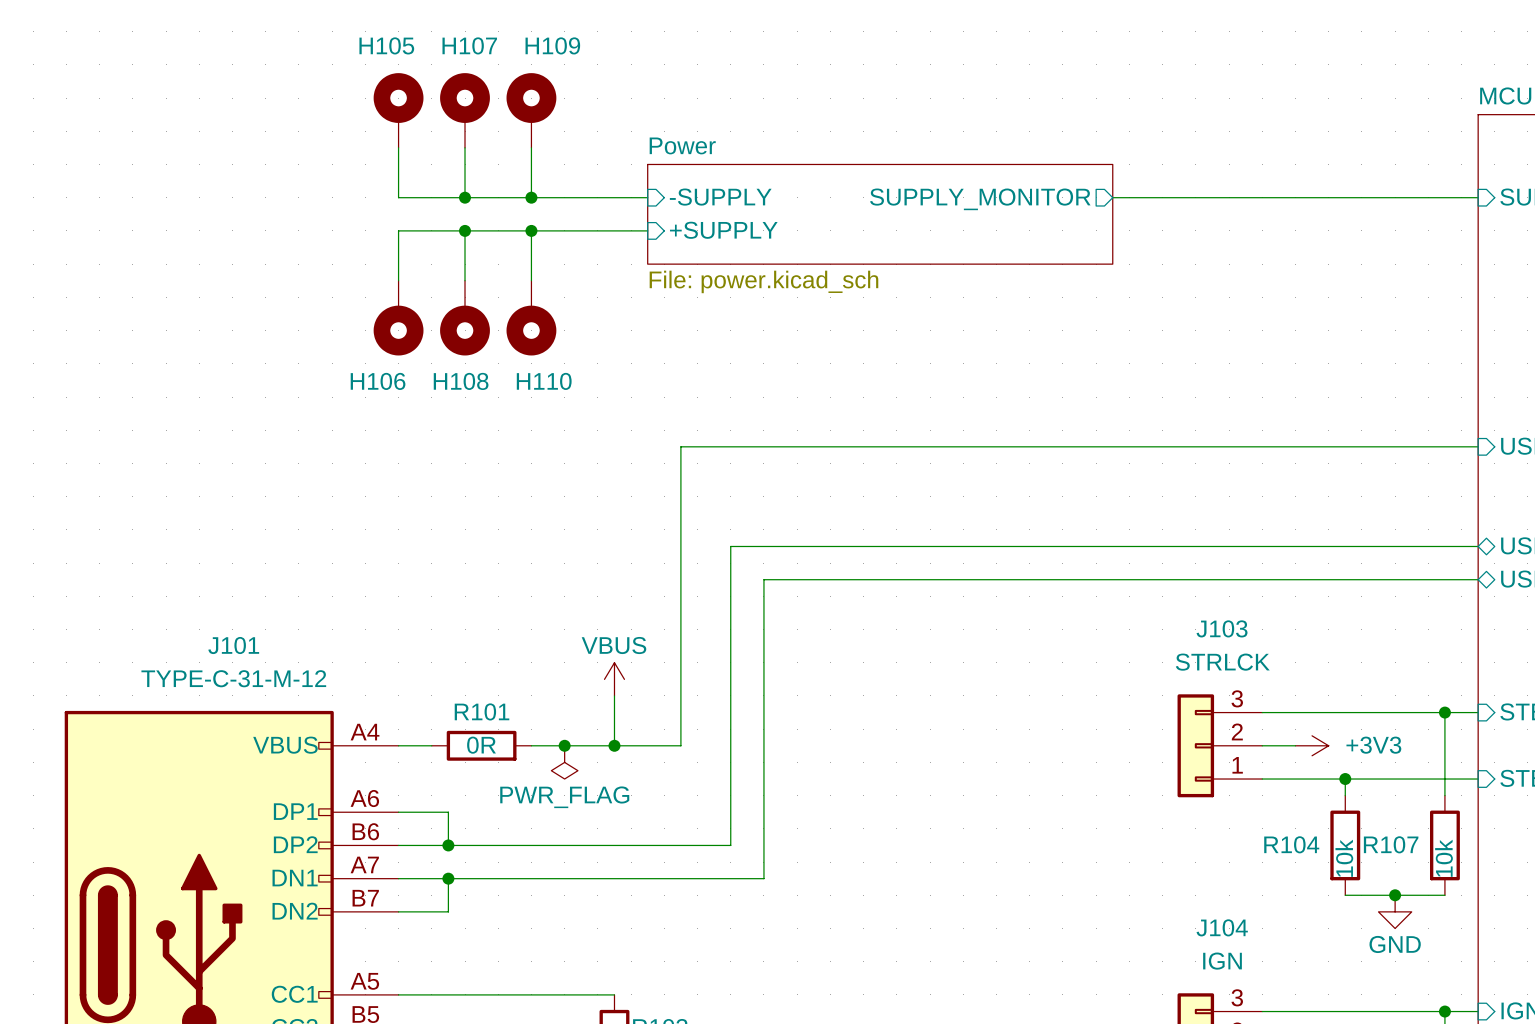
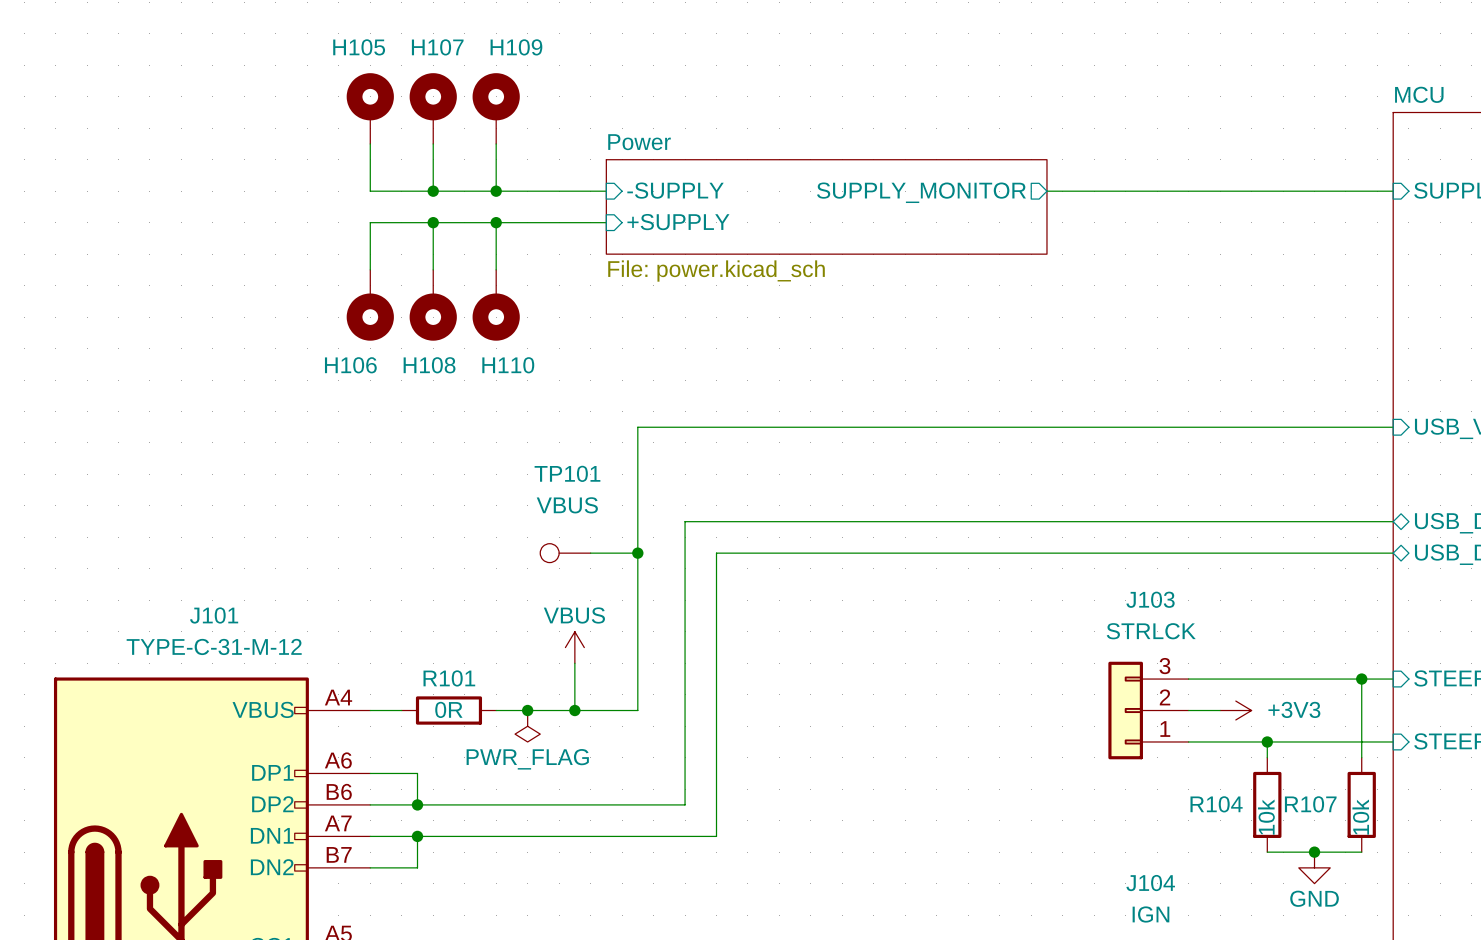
TP101: none -> VBUS (565, 553)
wire: none -> (590, 553) (637, 553)
junction: none -> (637, 553)

